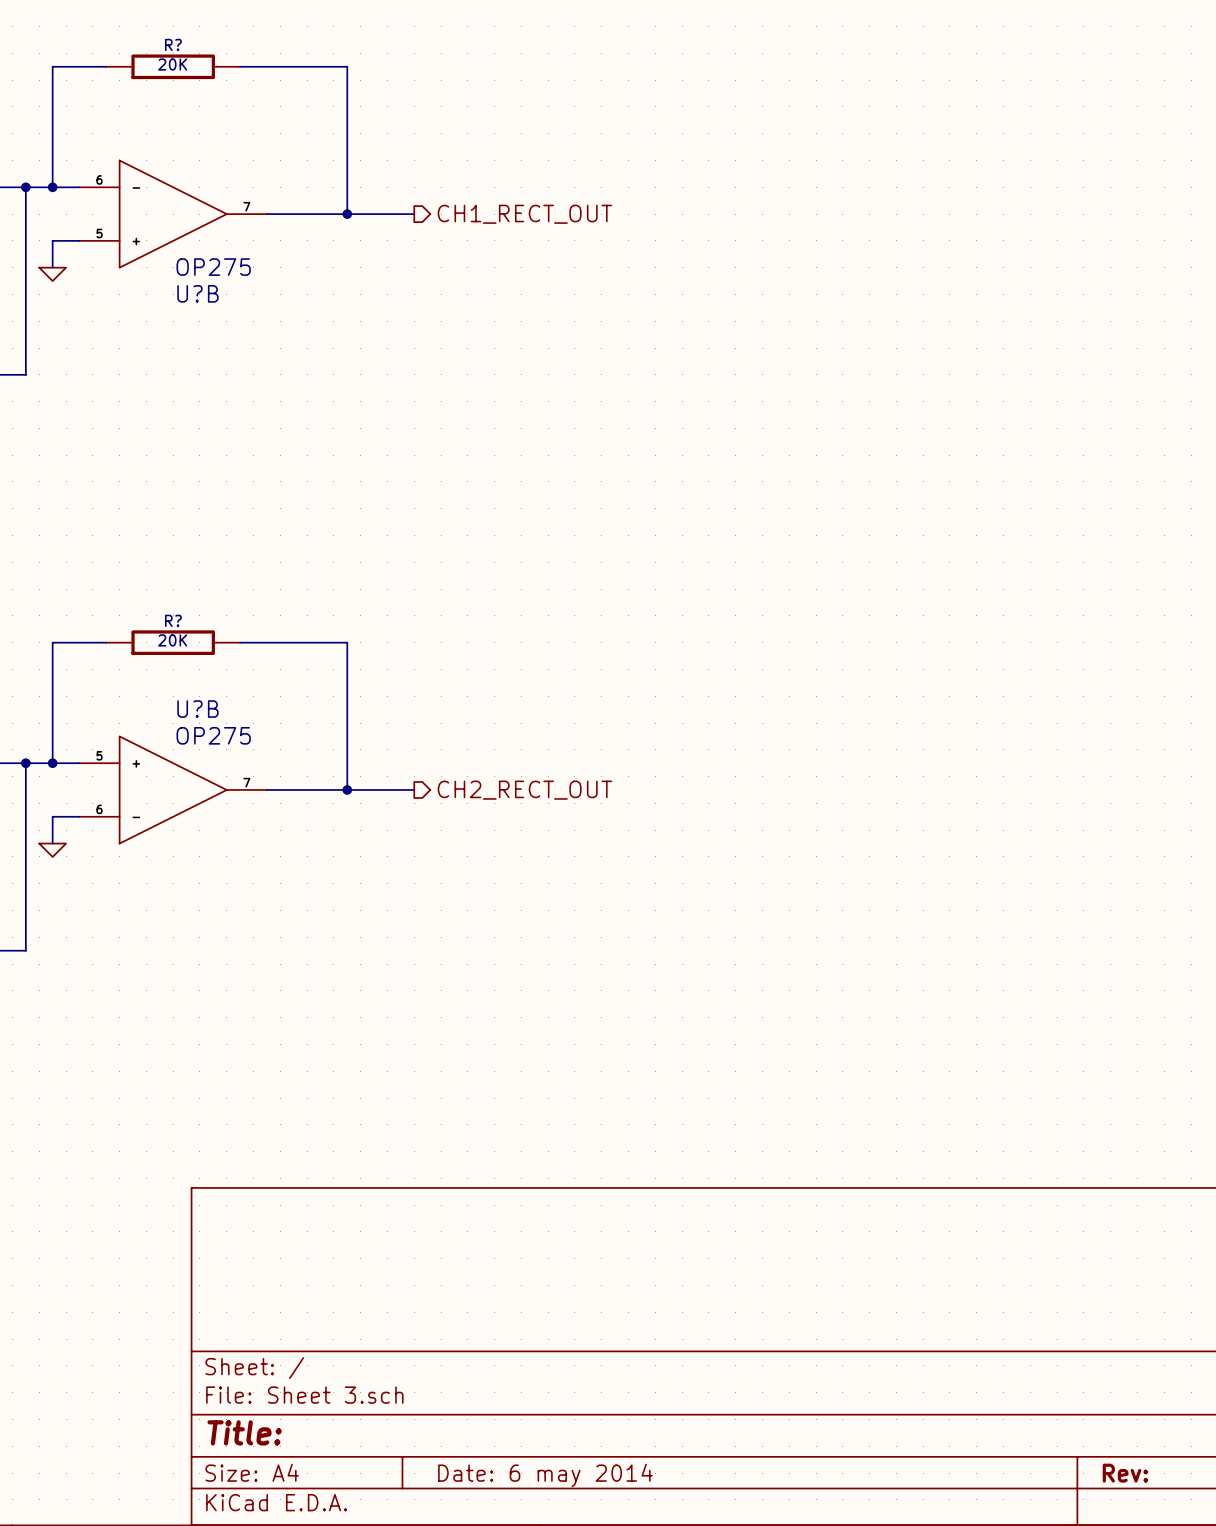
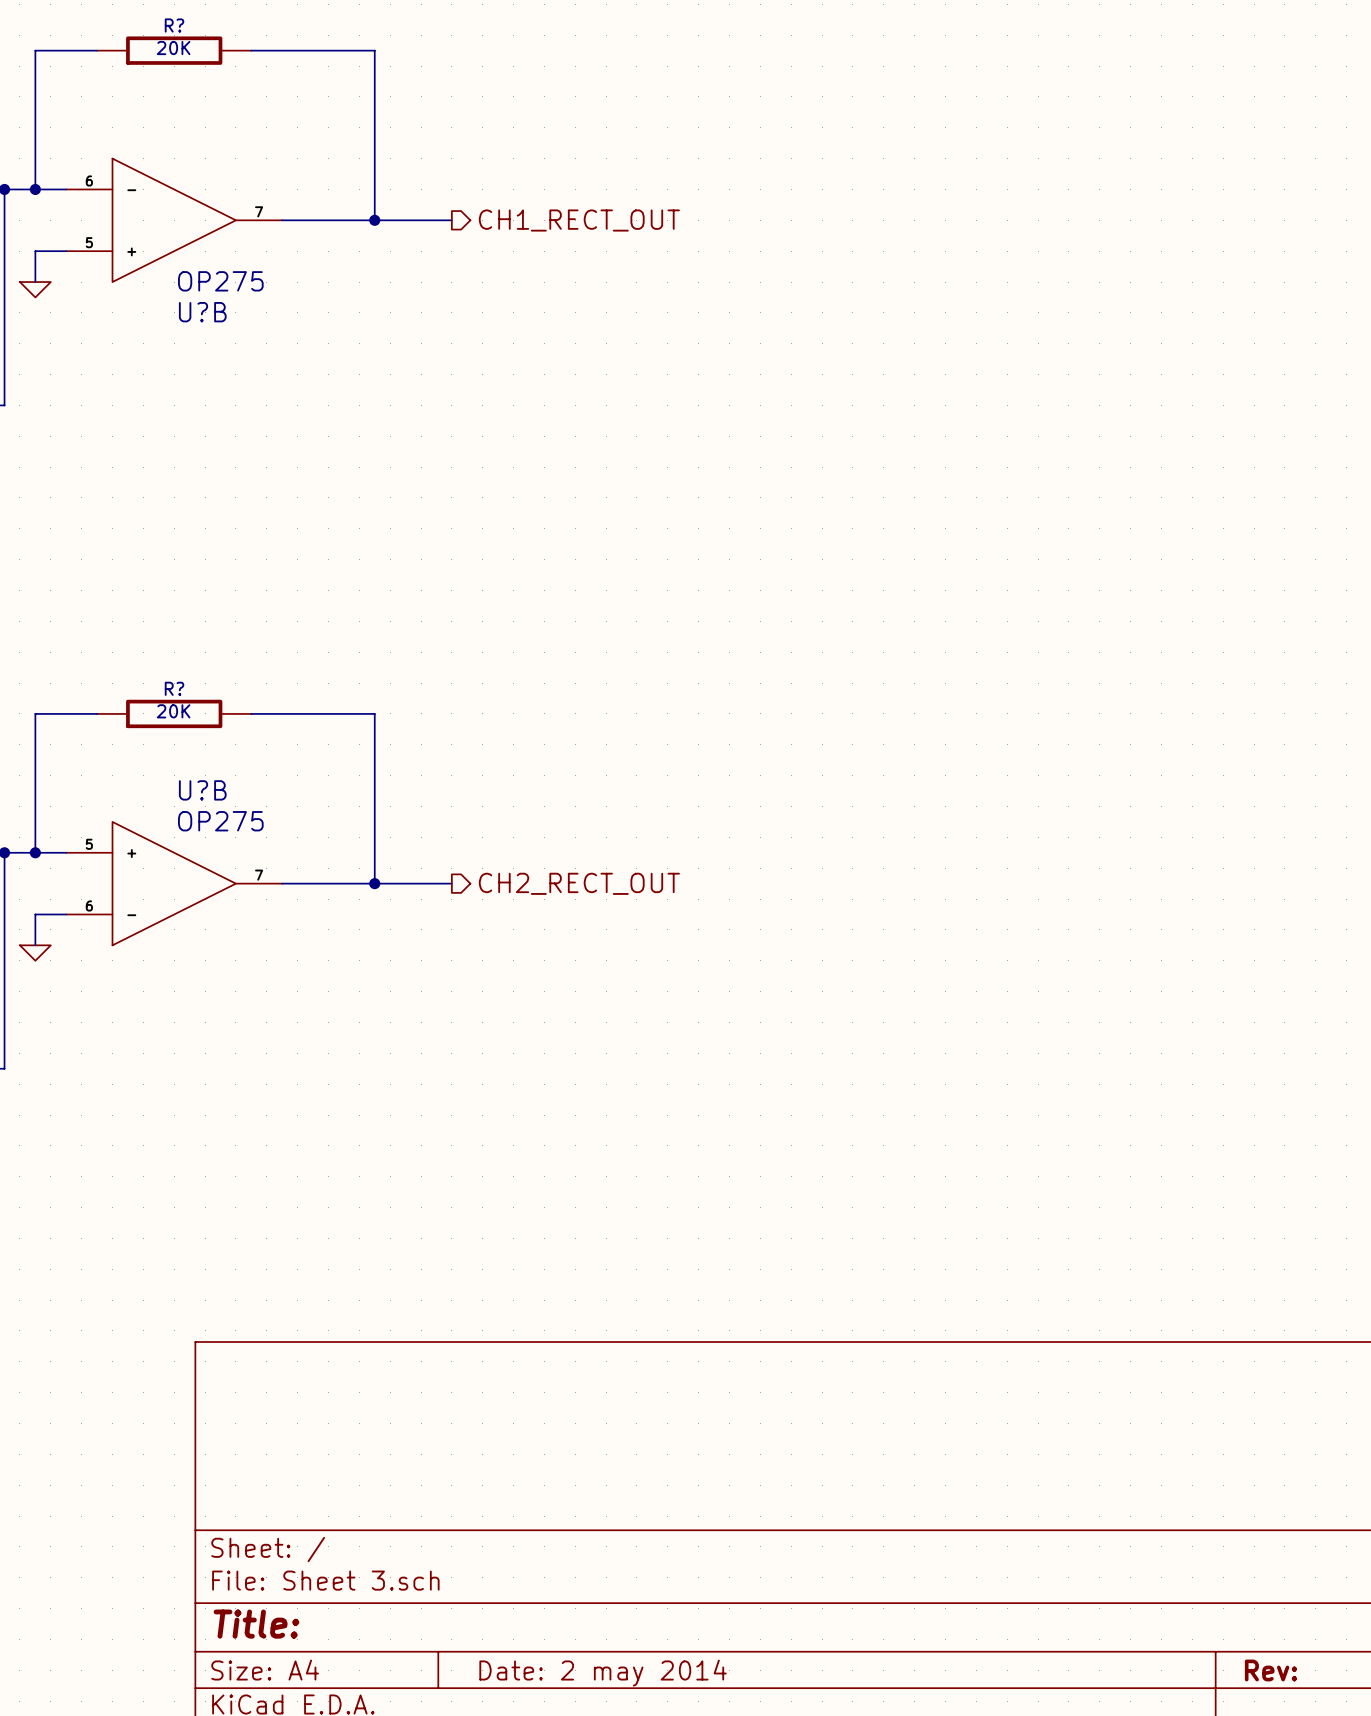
title block: Date: 6 may 2014 (545, 1475) -> Date: 2 may 2014 (603, 1673)

